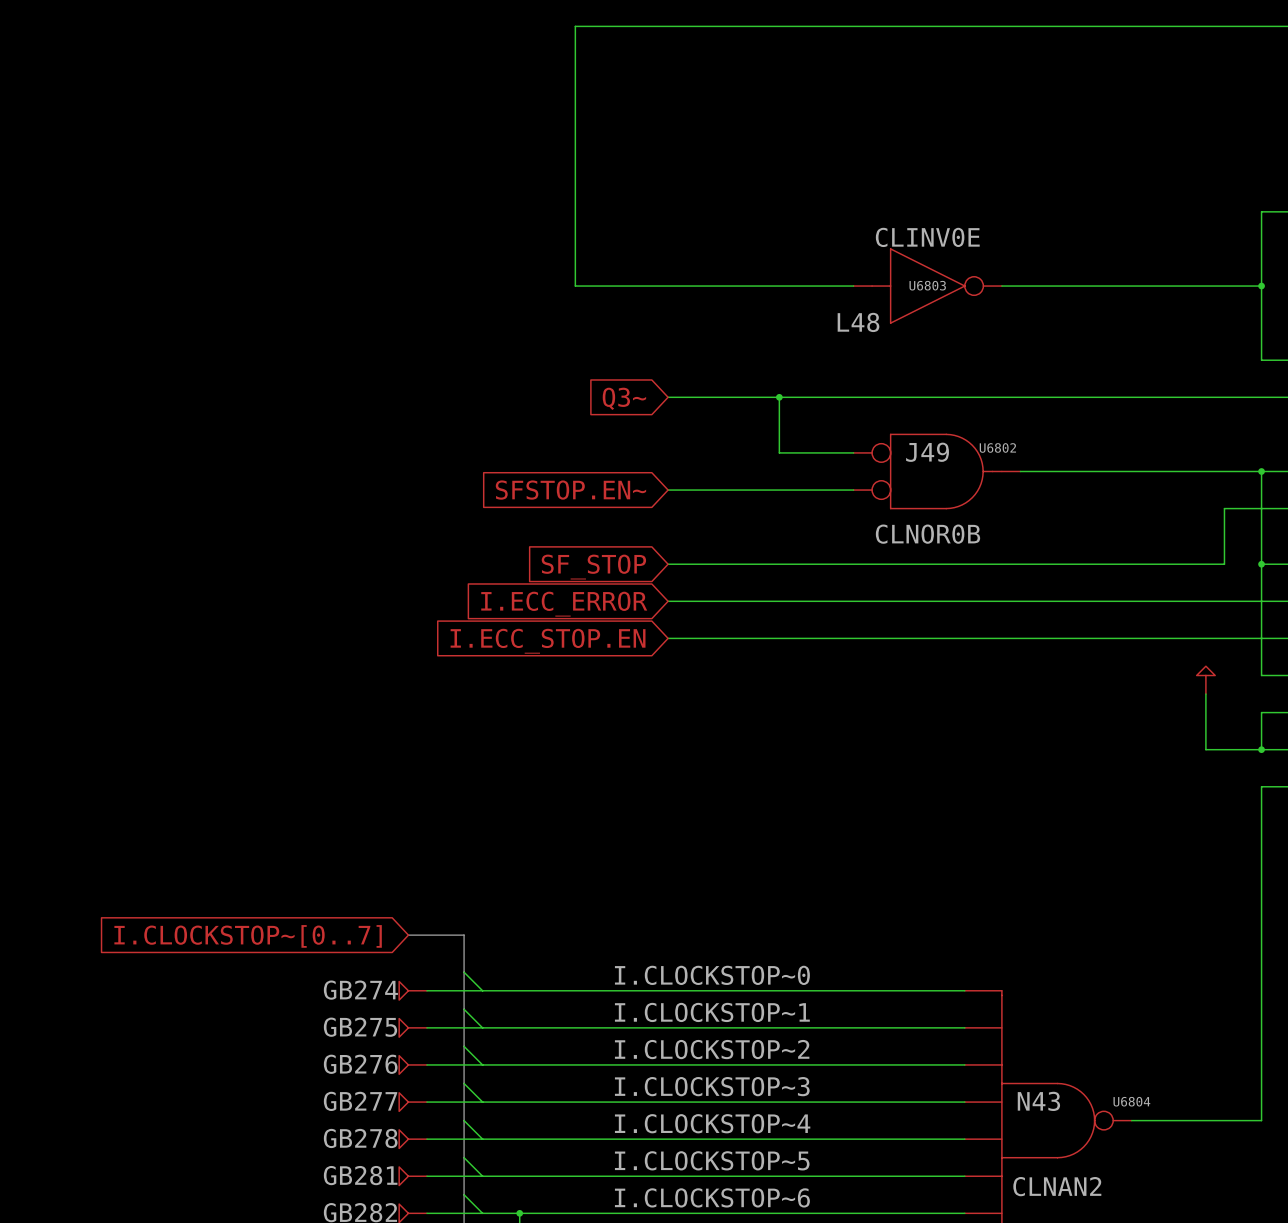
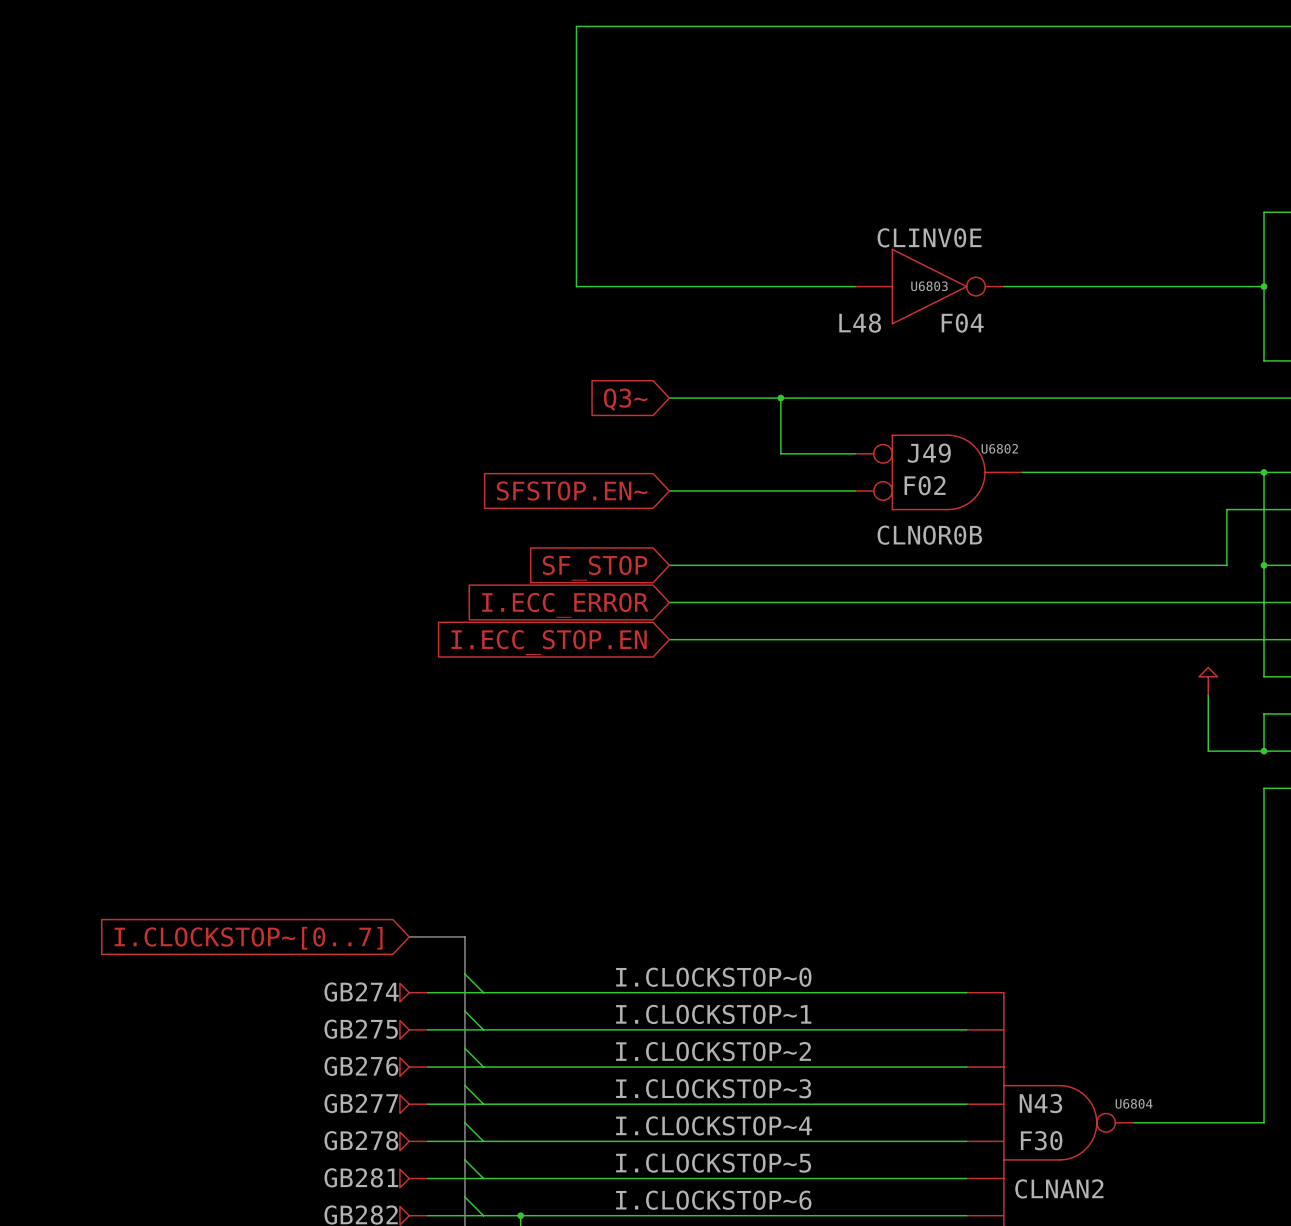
U6803 value: none -> F04 (962, 323)
U6802 value: none -> F02 (925, 485)
U6804 value: none -> F30 (1041, 1140)

